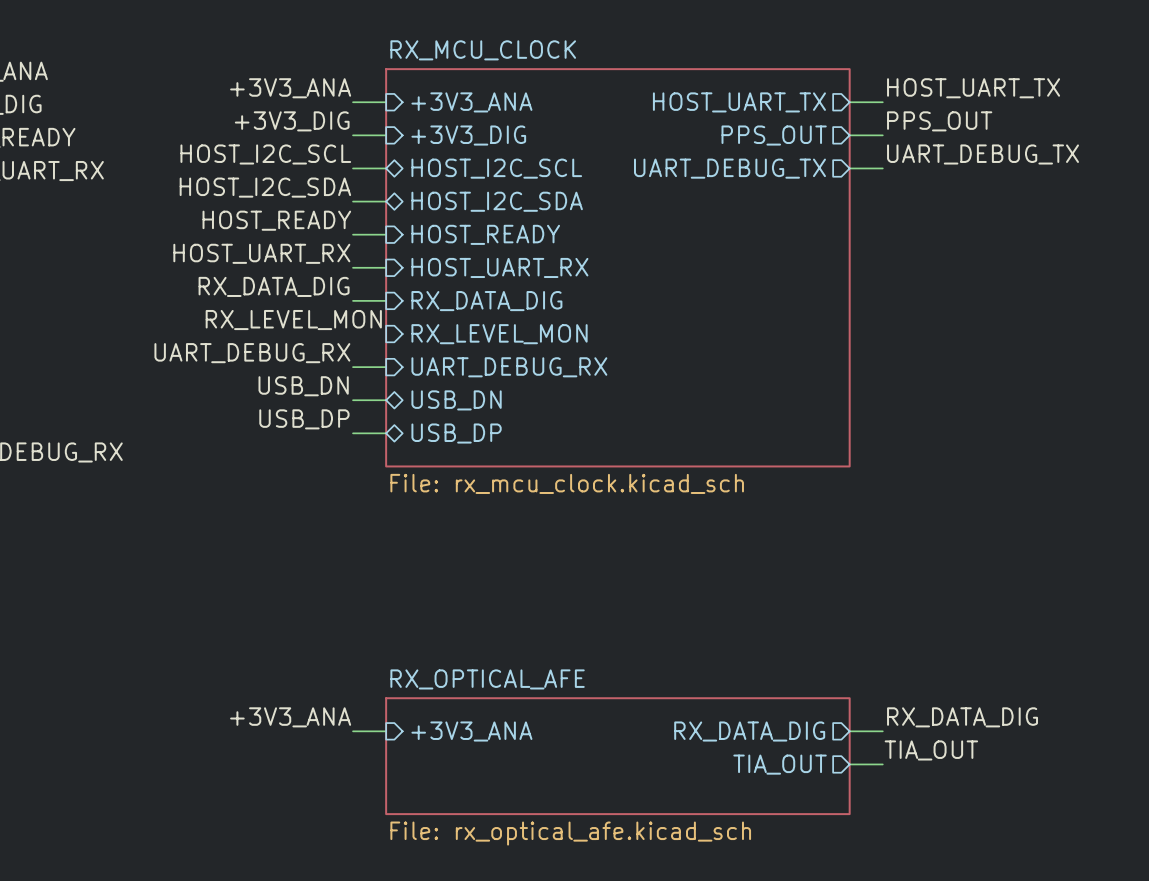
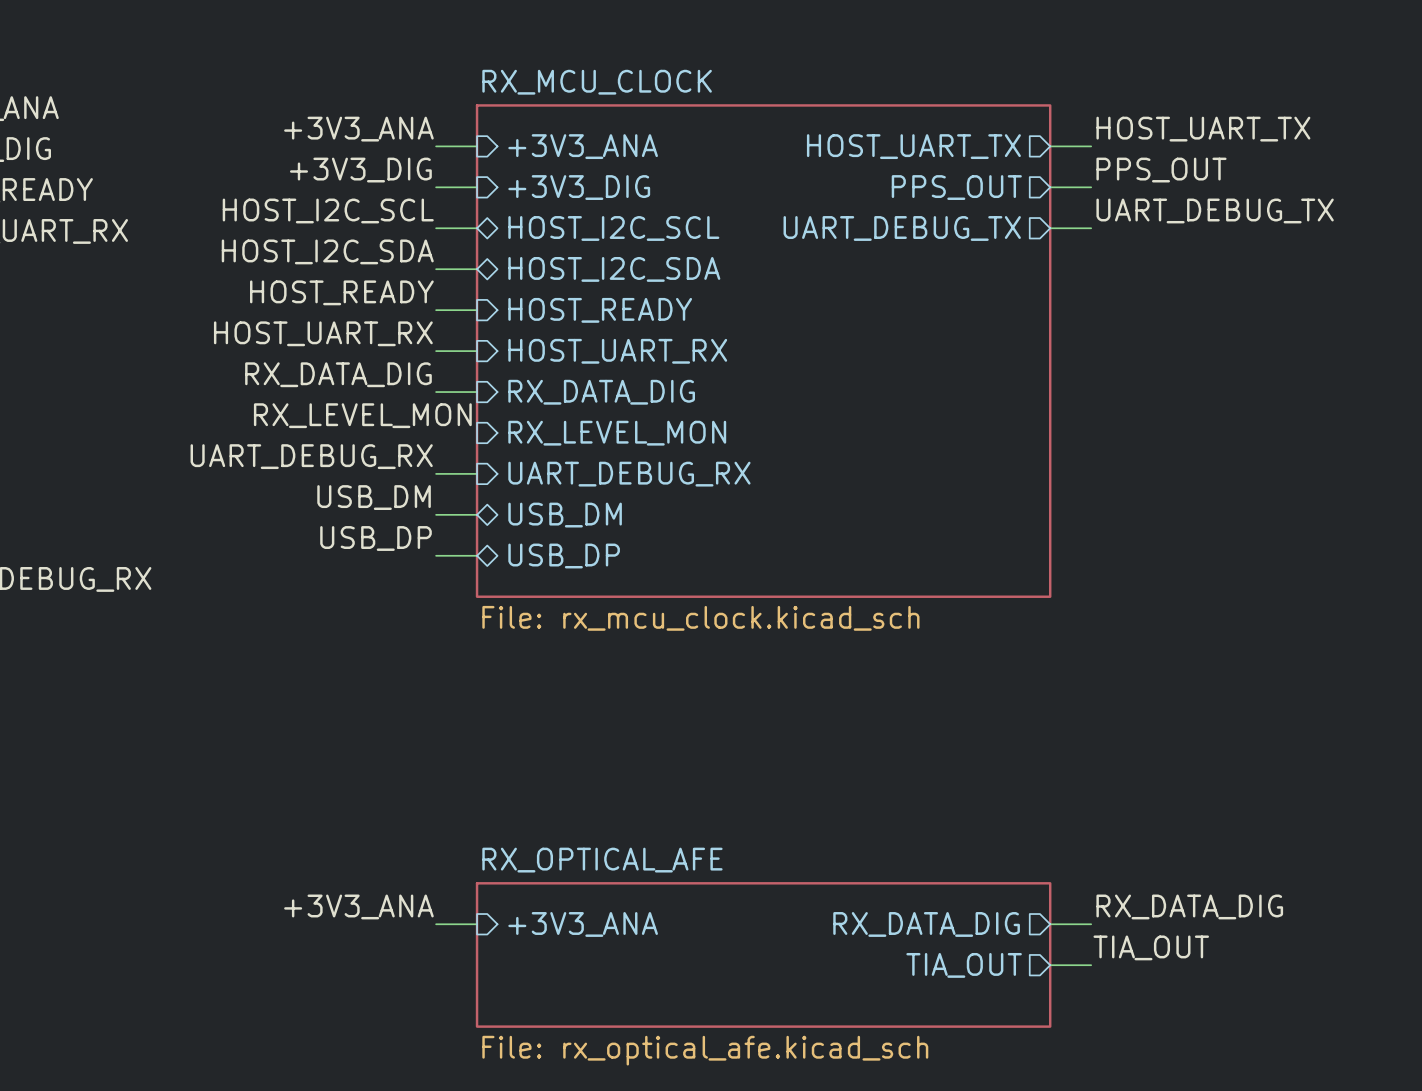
label: USB_DN (303, 386) -> USB_DM (374, 497)
sheet pin: USB_DN (456, 400) -> USB_DM (565, 515)

